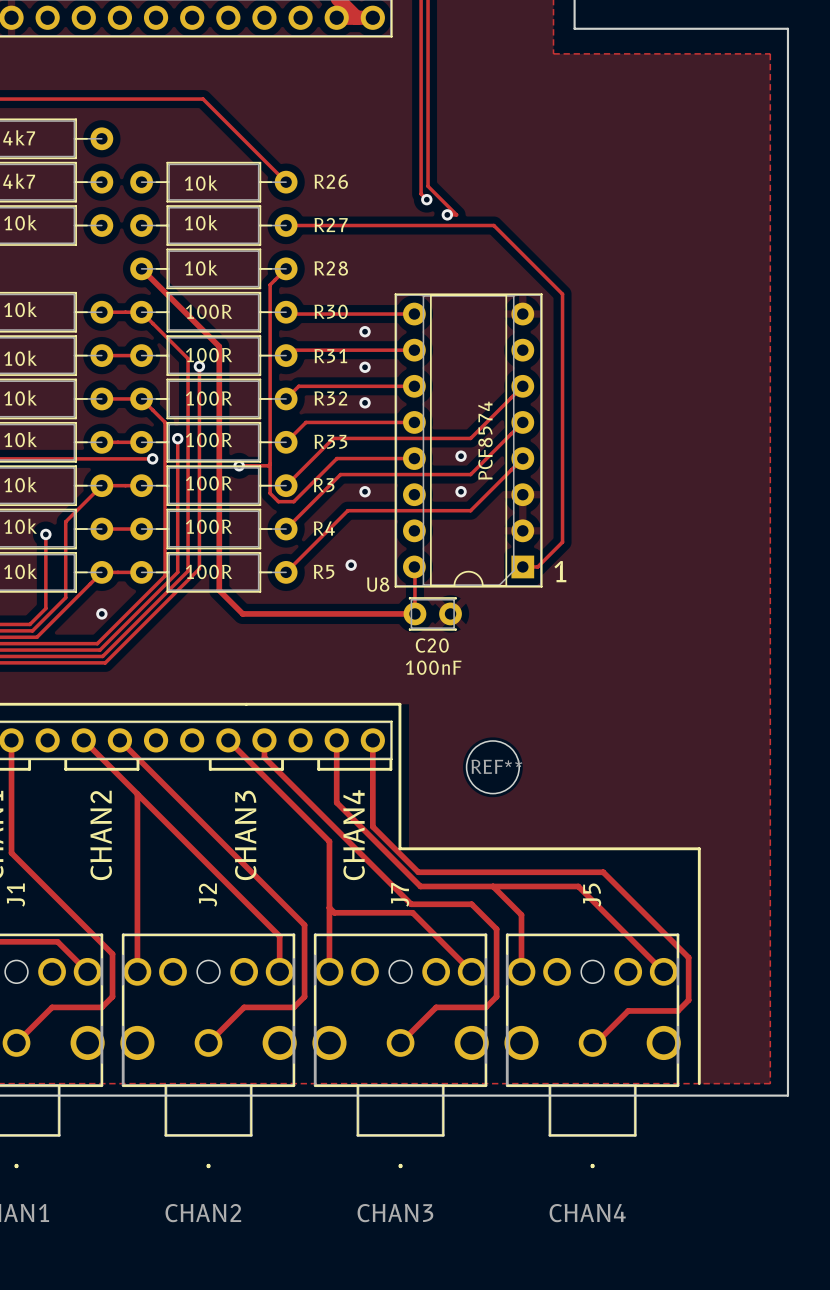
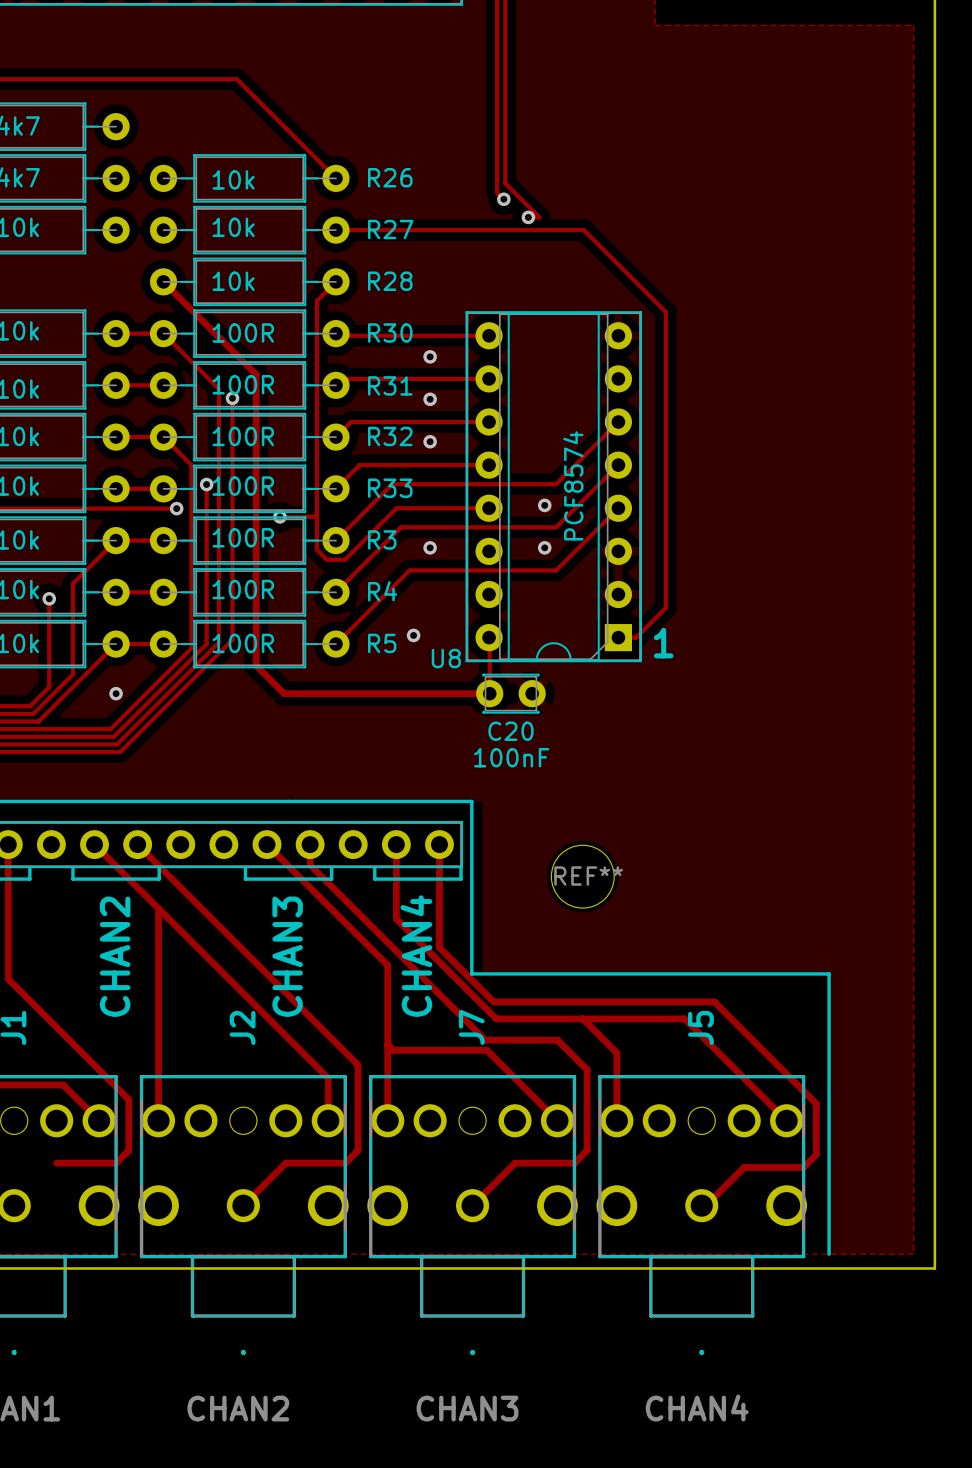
track: (52, 1007) (16, 1042) -> none

